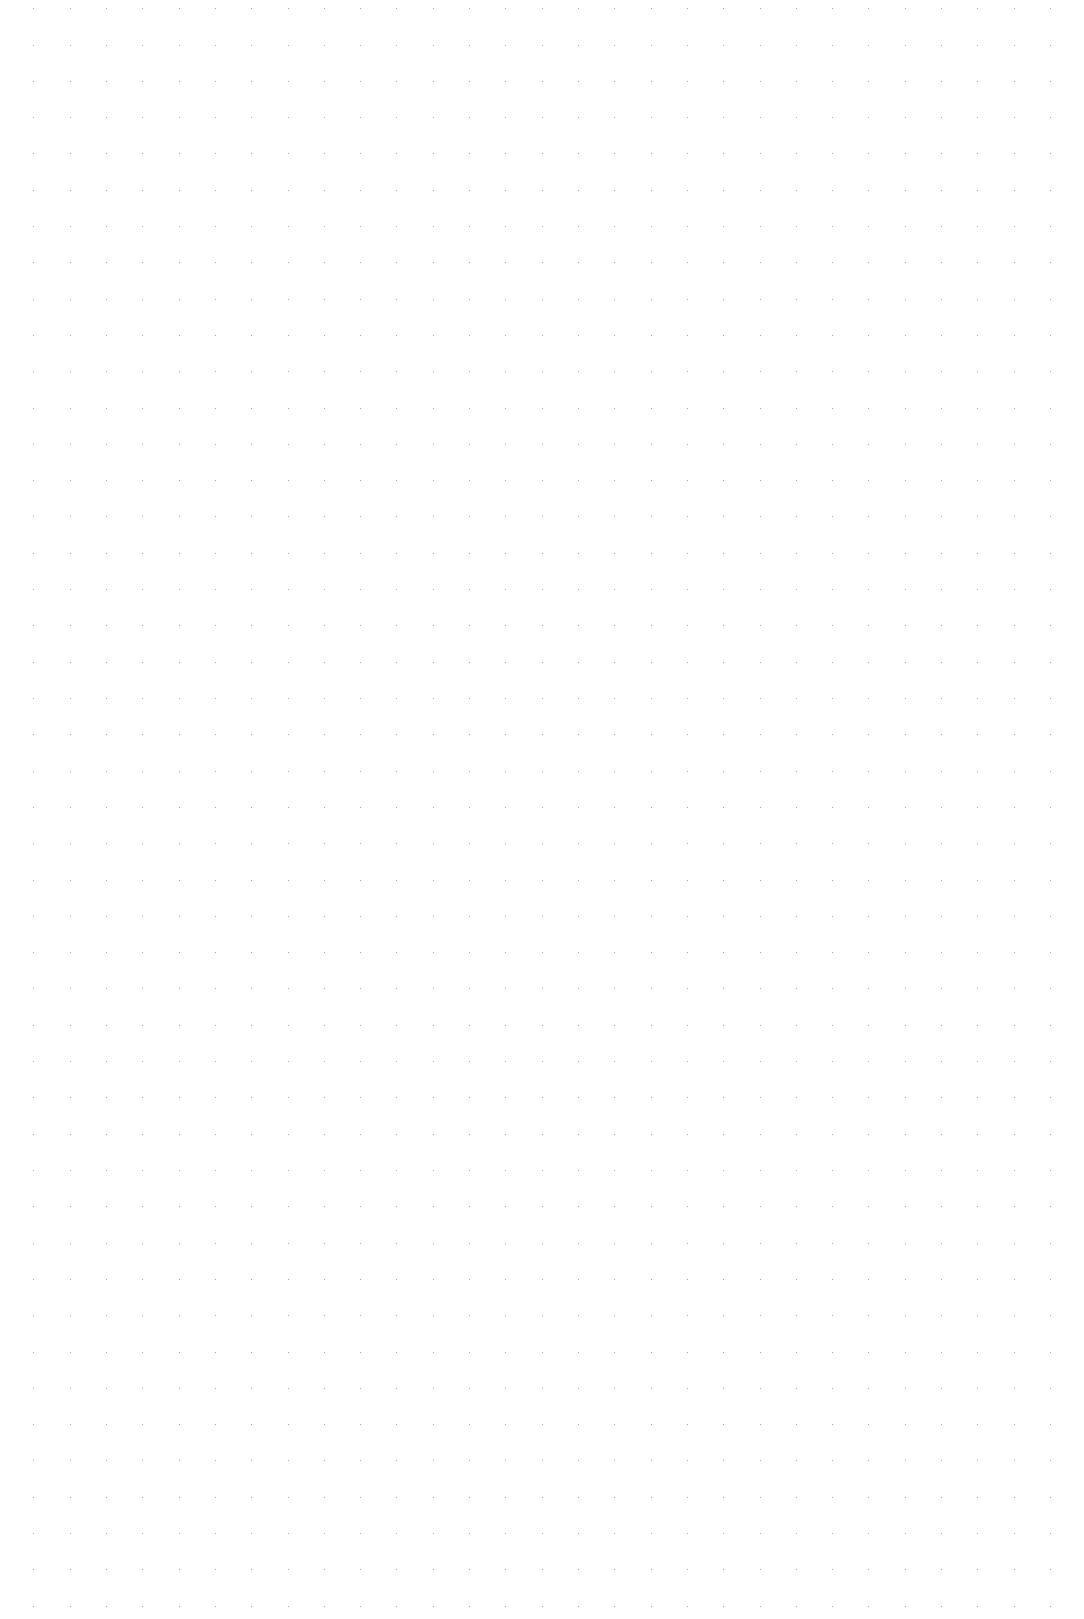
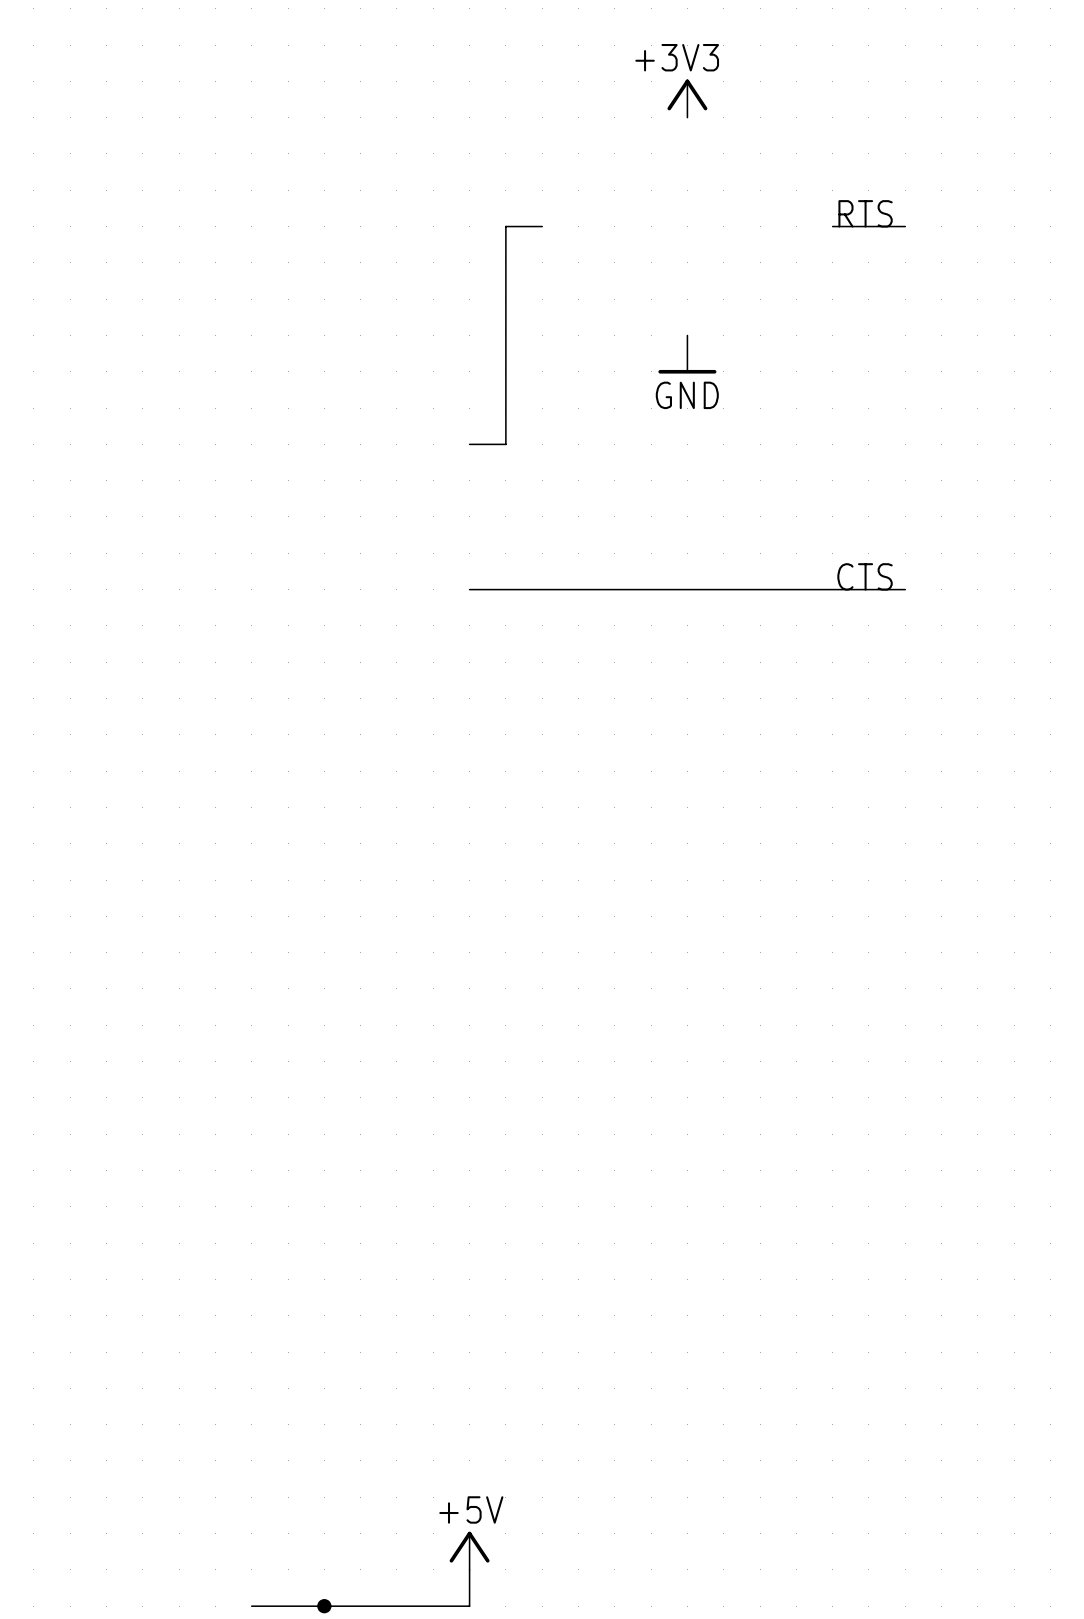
power symbol: none -> +3V3 (687, 98)
label: none -> RTS (865, 213)
wire: none -> (542, 226) (505, 226) (505, 444) (469, 444)
wire: none -> (832, 226) (905, 226)
power symbol: none -> GND (687, 354)
label: none -> CTS (865, 576)
wire: none -> (469, 589) (905, 589)
power symbol: none -> +5V (469, 1550)
wire: none -> (469, 1569) (469, 1606) (251, 1606)
junction: none -> (324, 1606)

